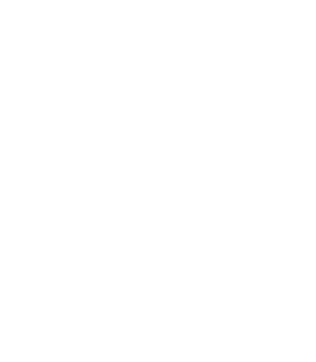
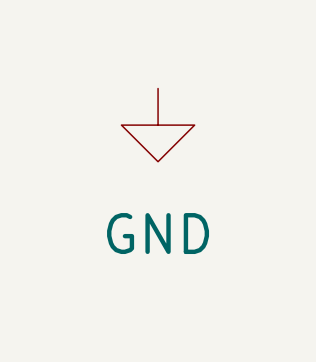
power symbol: none -> GND (158, 125)

